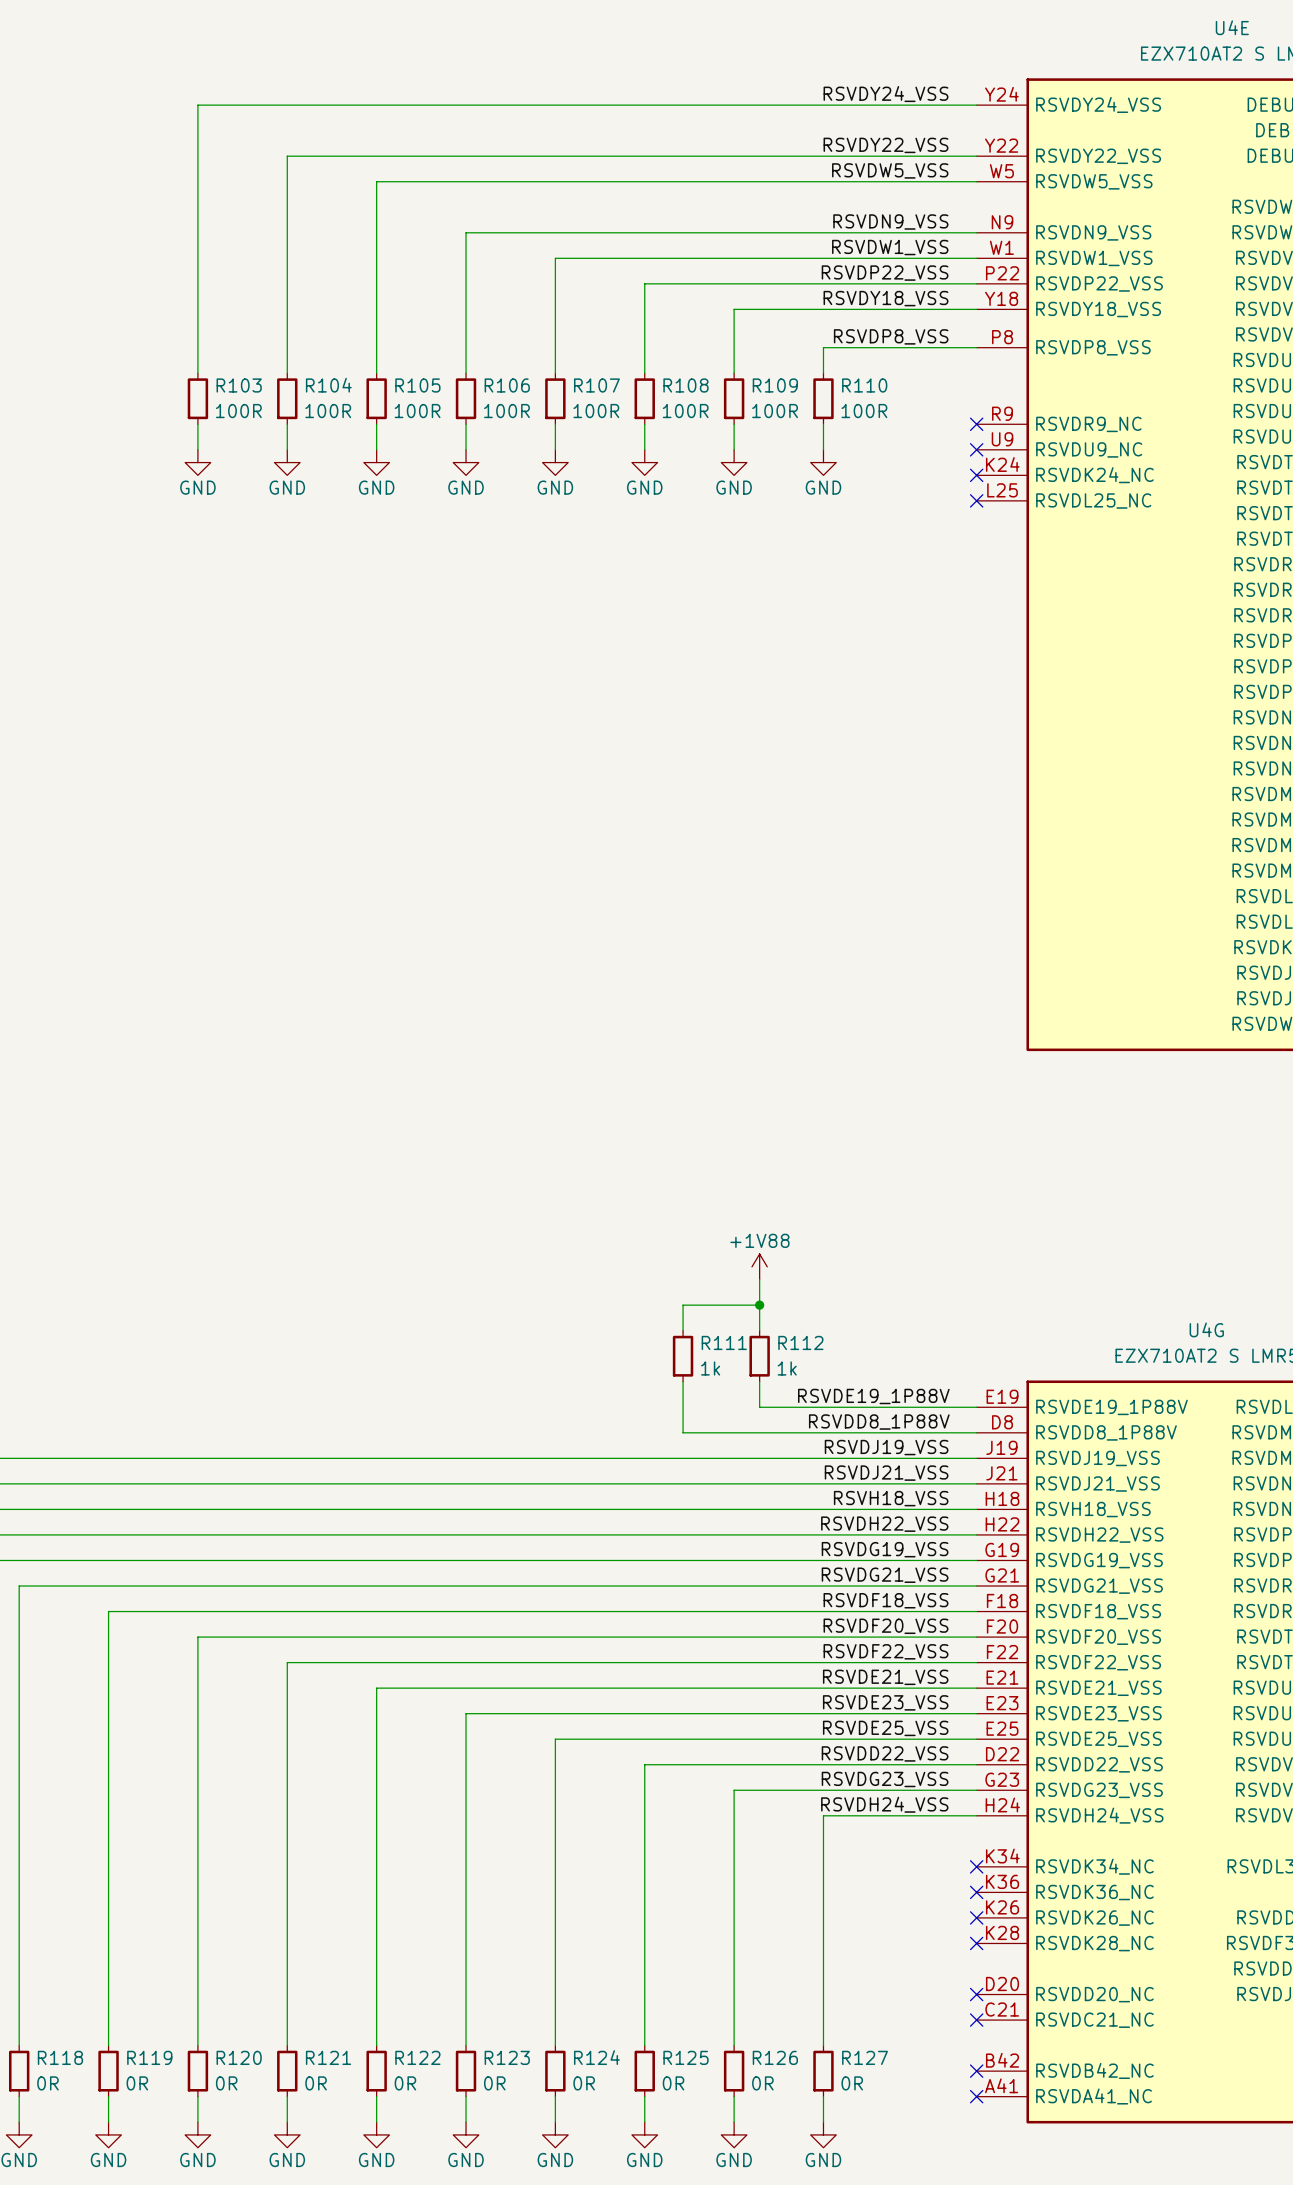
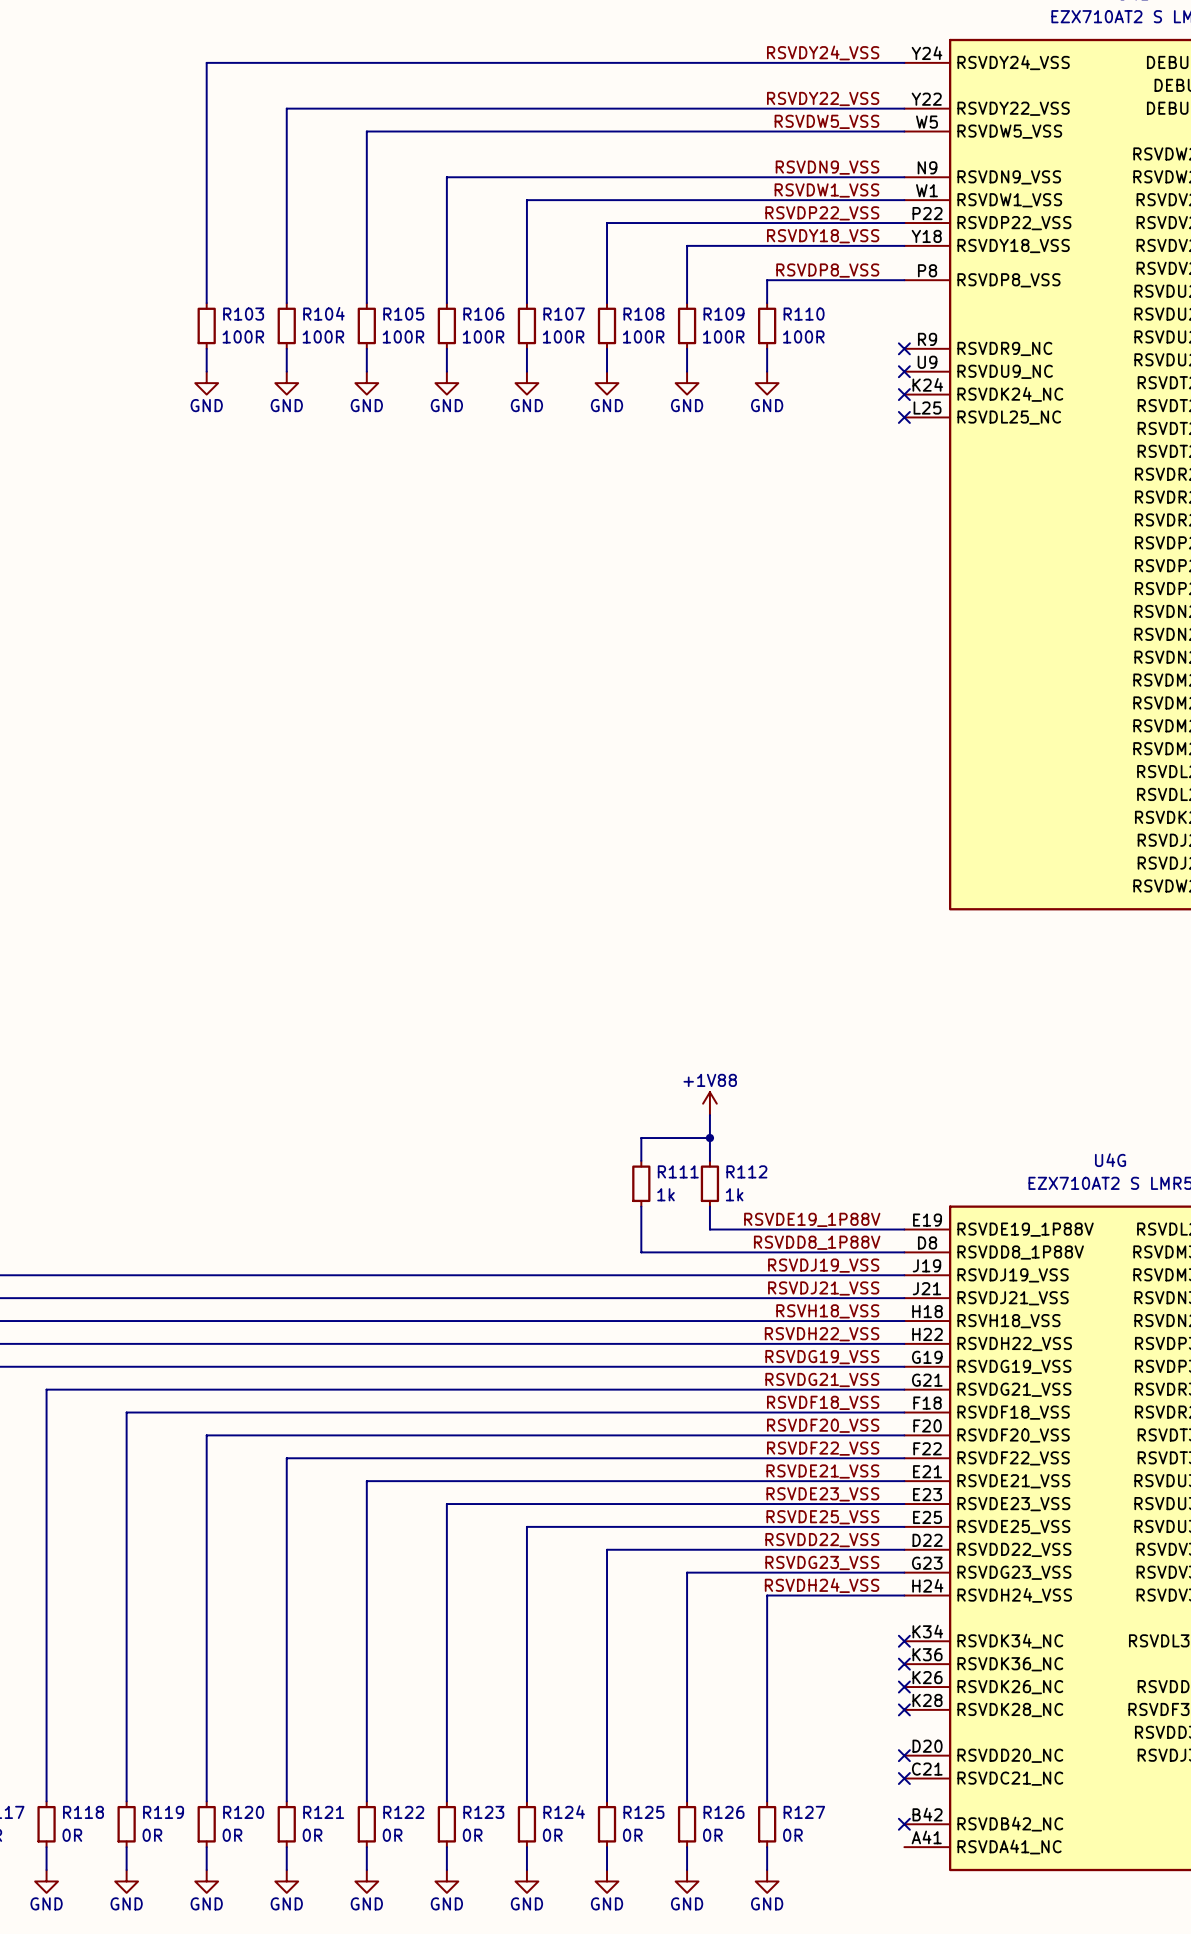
no-connect mark: (976, 2096) -> none

